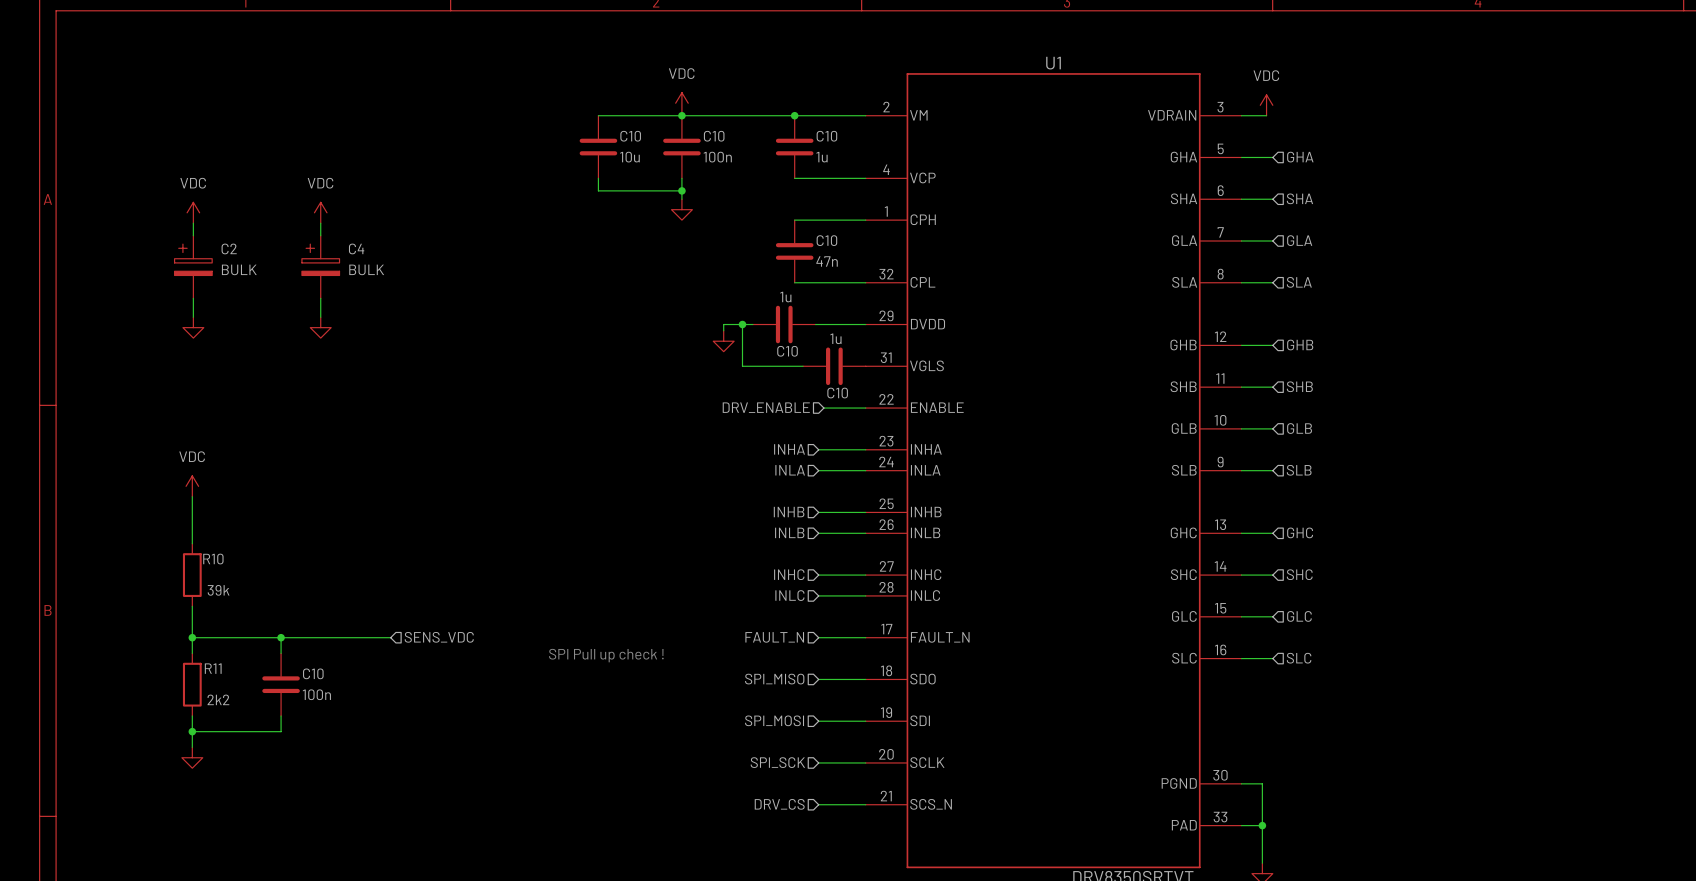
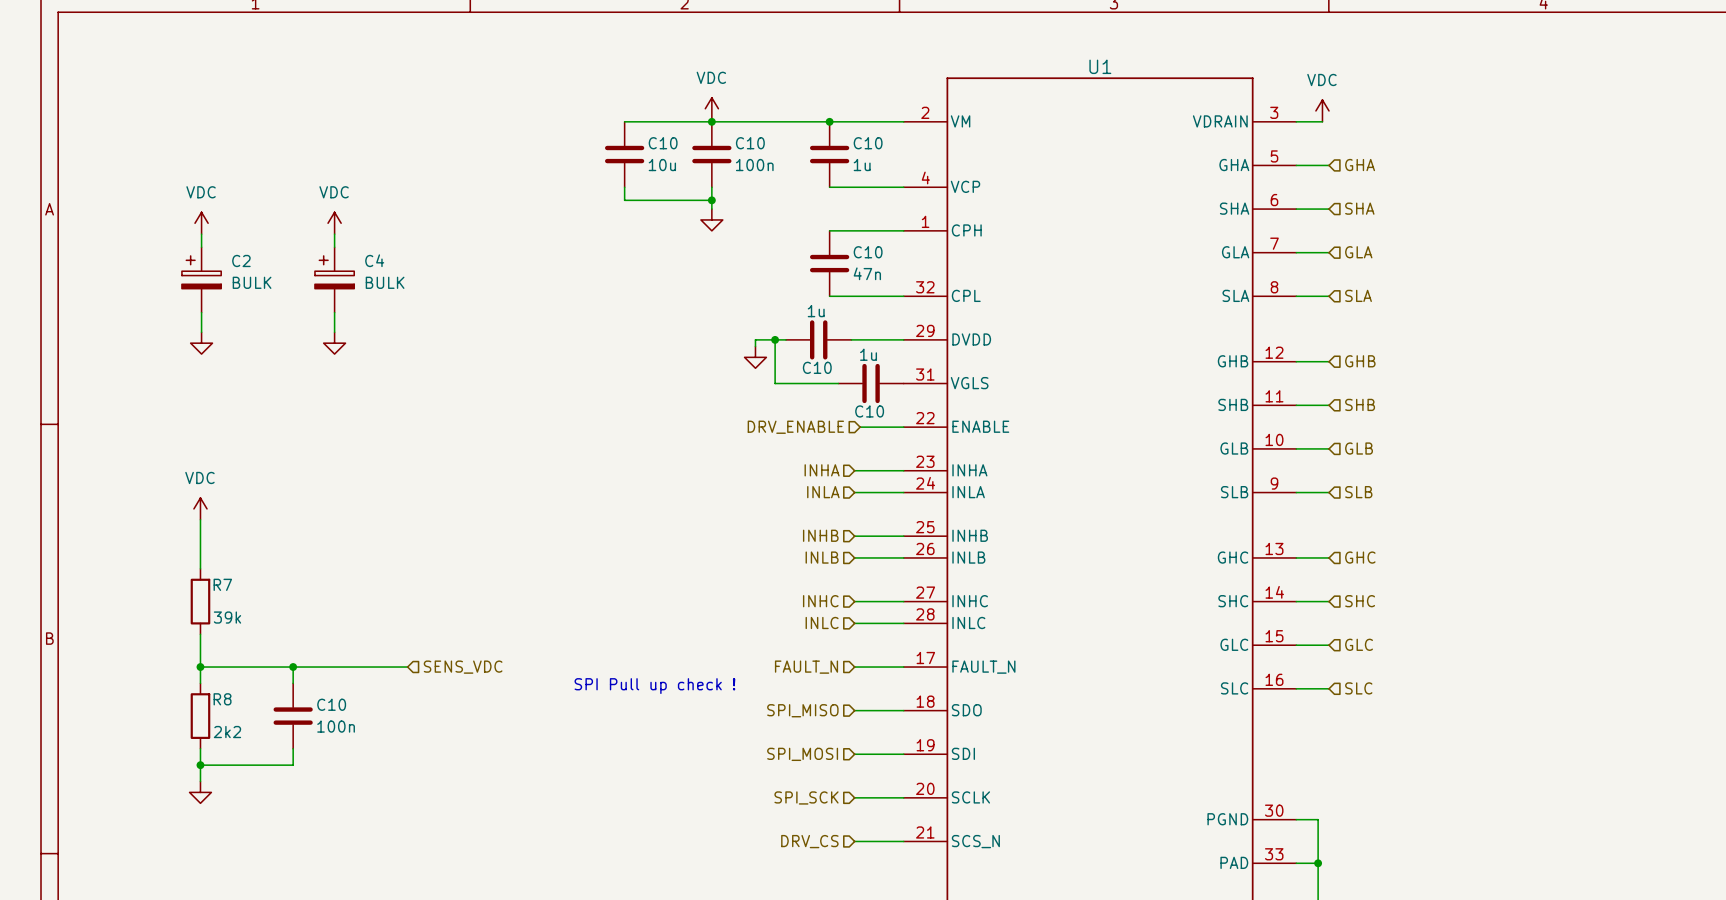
R10 name: R10 (213, 559) -> R7 (222, 584)
R11 name: R11 (213, 668) -> R8 (222, 699)

